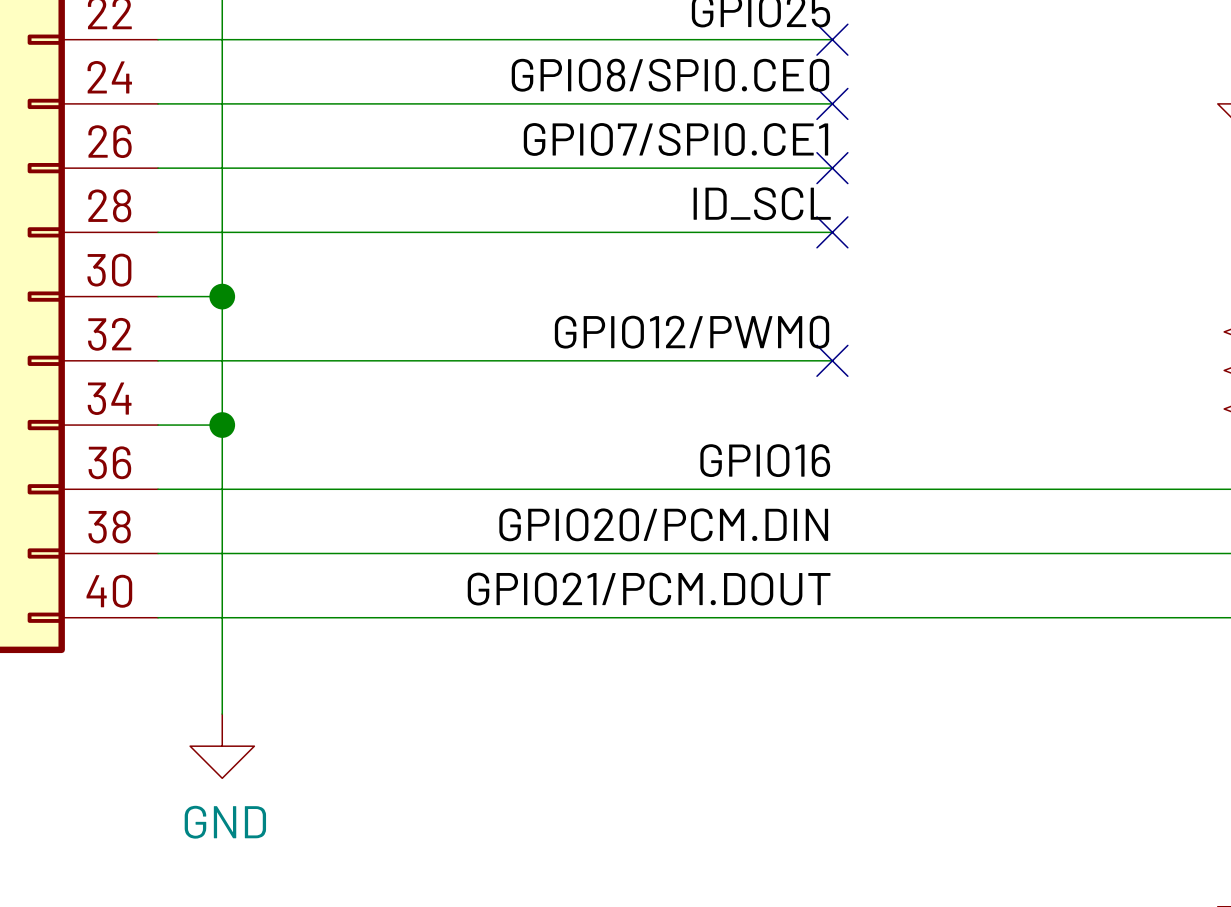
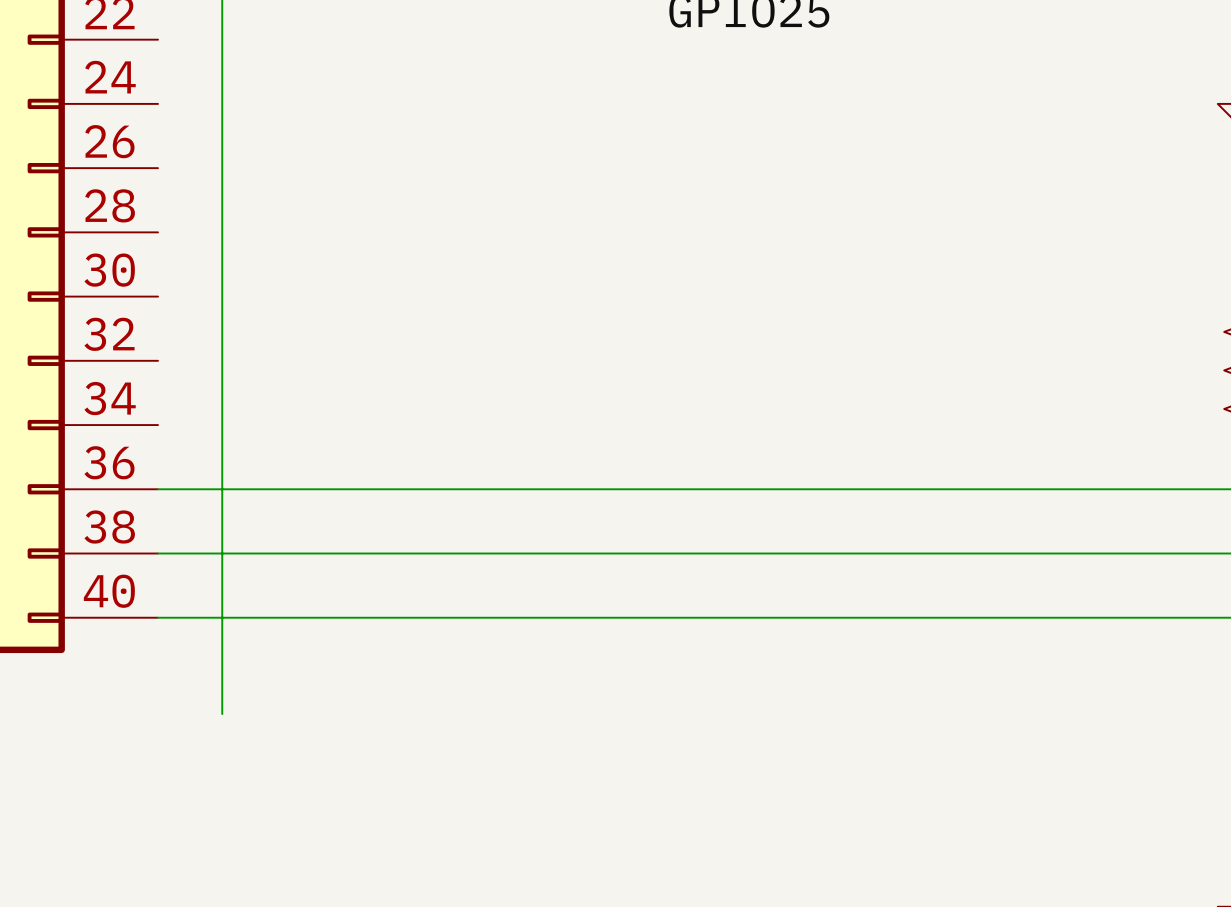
wire: (158, 39) (832, 39) -> none
no-connect mark: (832, 39) -> none
label: GPIO8/SPI0.CE0 (670, 75) -> none
wire: (158, 103) (832, 103) -> none
no-connect mark: (832, 103) -> none
label: GPIO7/SPI0.CE1 (675, 139) -> none
wire: (158, 168) (832, 168) -> none
no-connect mark: (832, 168) -> none
label: ID_SCL (762, 203) -> none
wire: (158, 232) (832, 232) -> none
no-connect mark: (832, 232) -> none
wire: (158, 296) (222, 296) -> none
junction: (222, 296) -> none
label: GPIO12/PWM0 (692, 332) -> none
wire: (158, 360) (832, 360) -> none
no-connect mark: (832, 360) -> none
wire: (158, 425) (222, 425) -> none
junction: (222, 425) -> none
label: GPIO16 (765, 460) -> none
label: GPIO20/PCM.DIN (663, 524) -> none
label: GPIO21/PCM.DOUT (649, 589) -> none
power symbol: GND (222, 746) -> none

